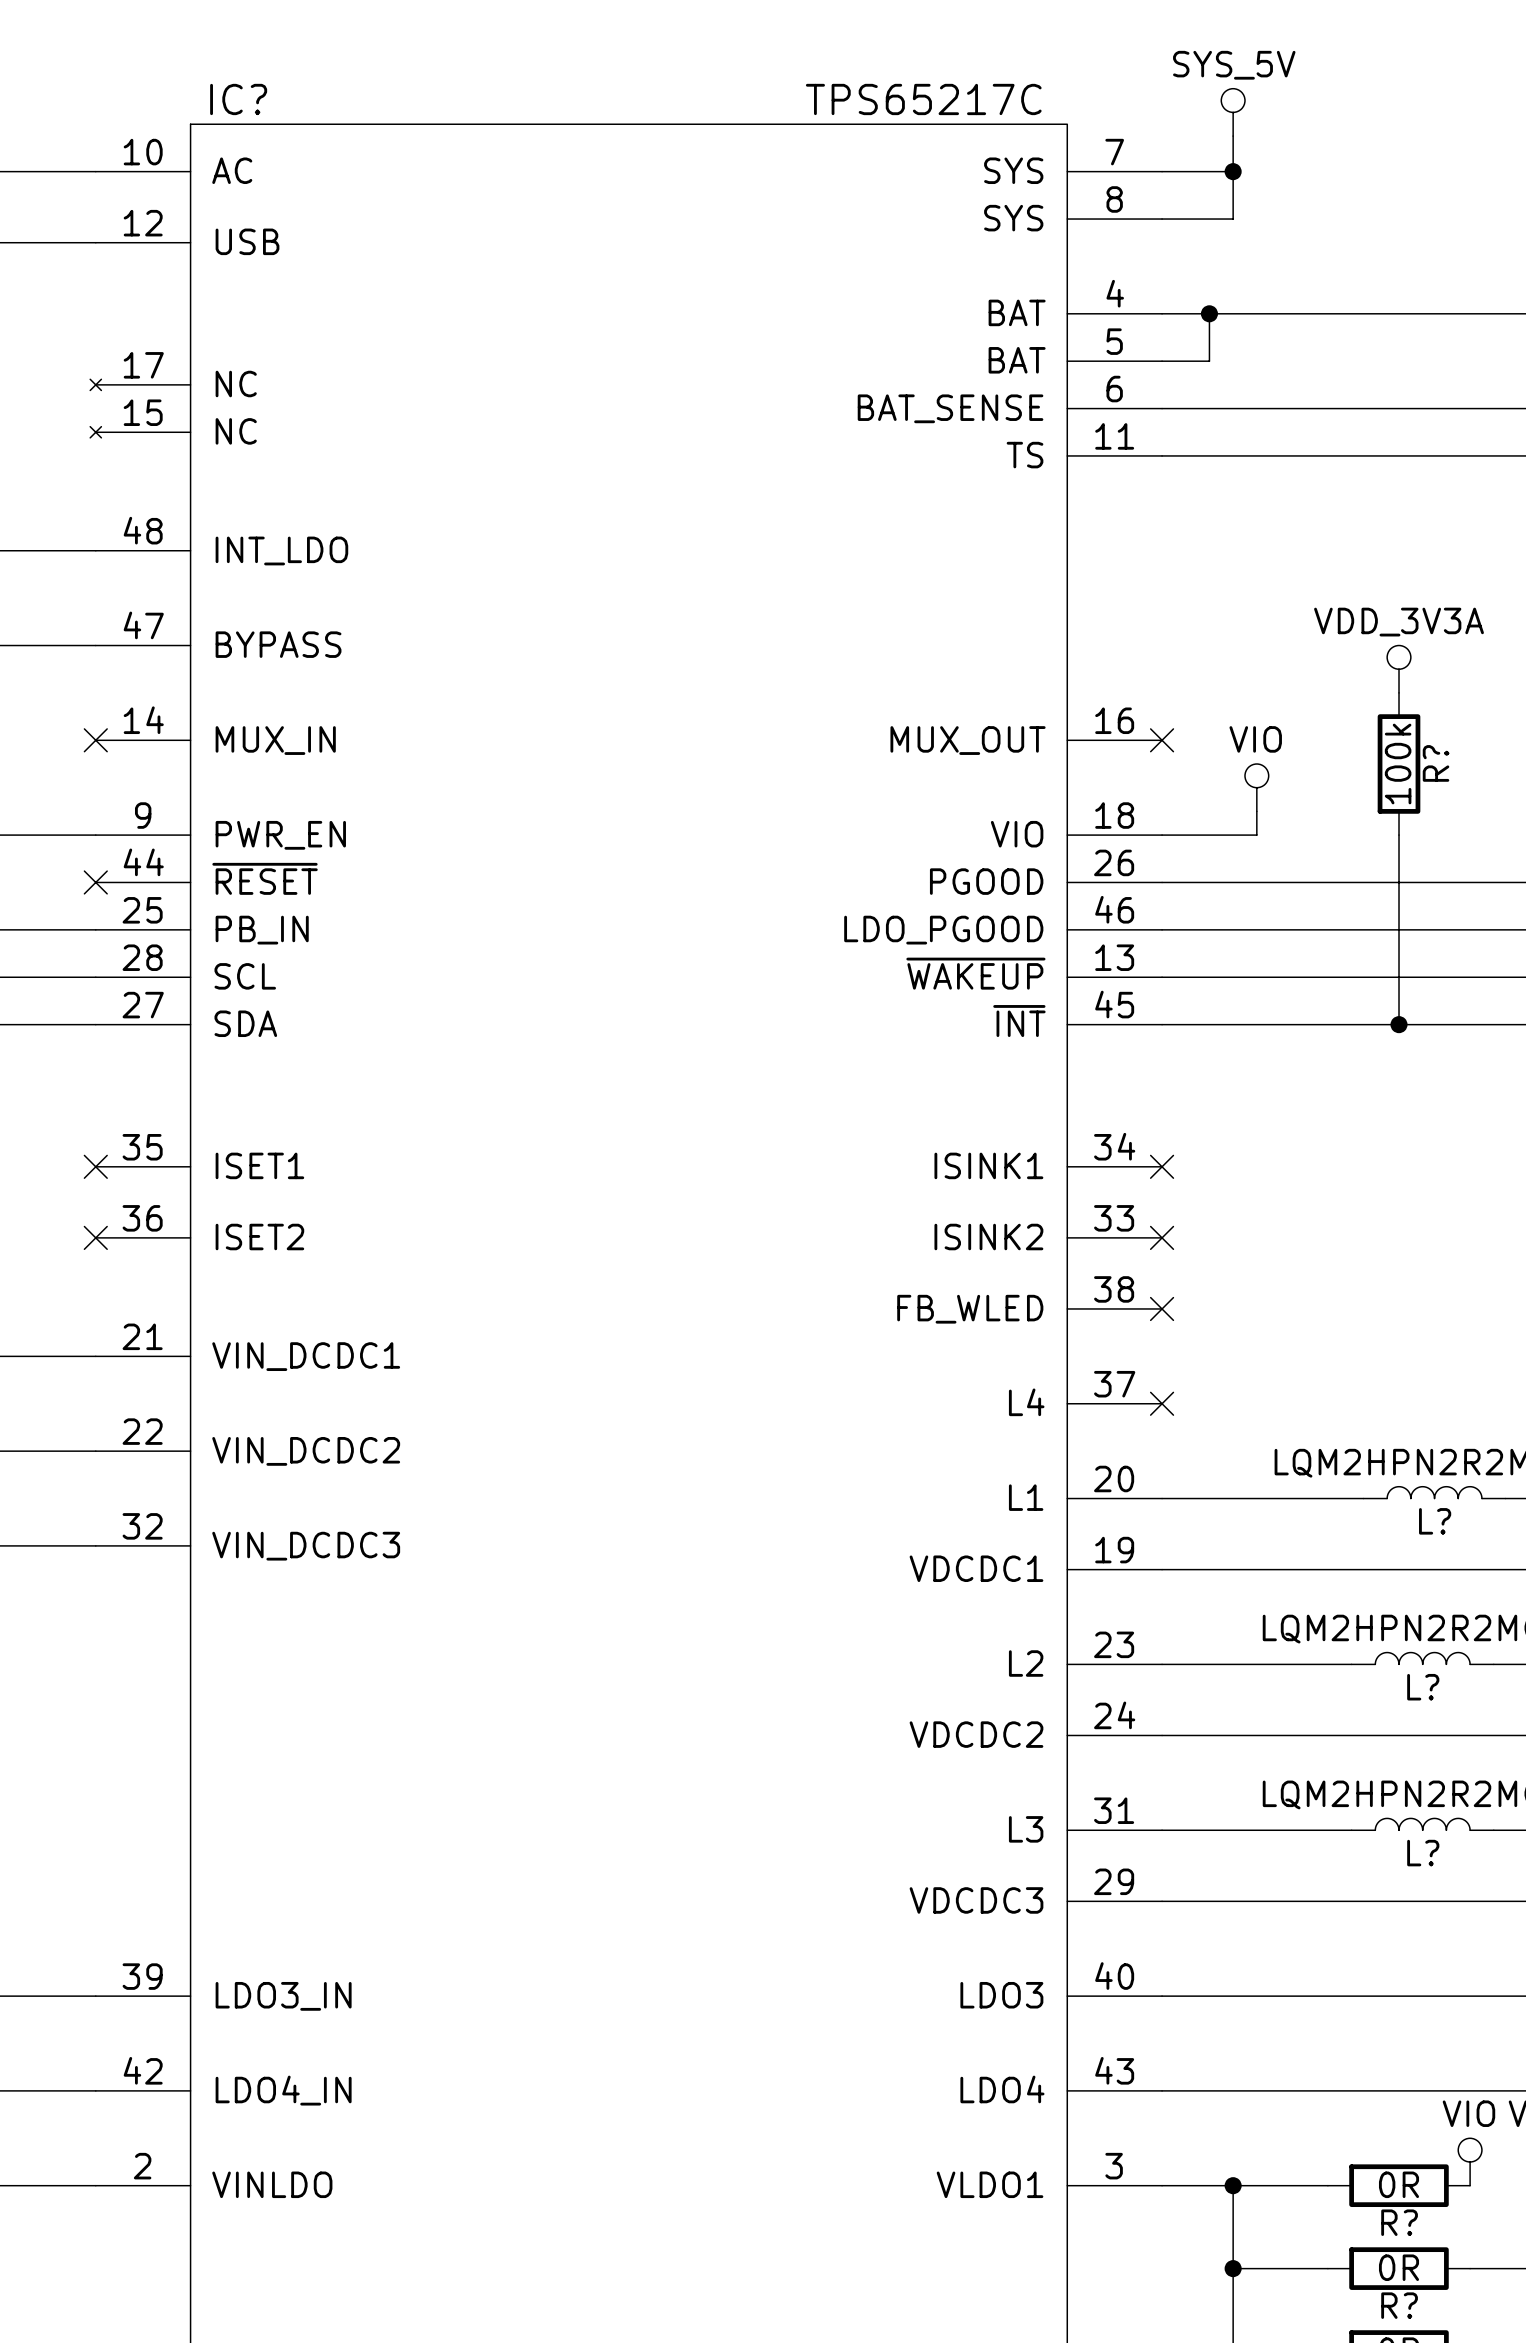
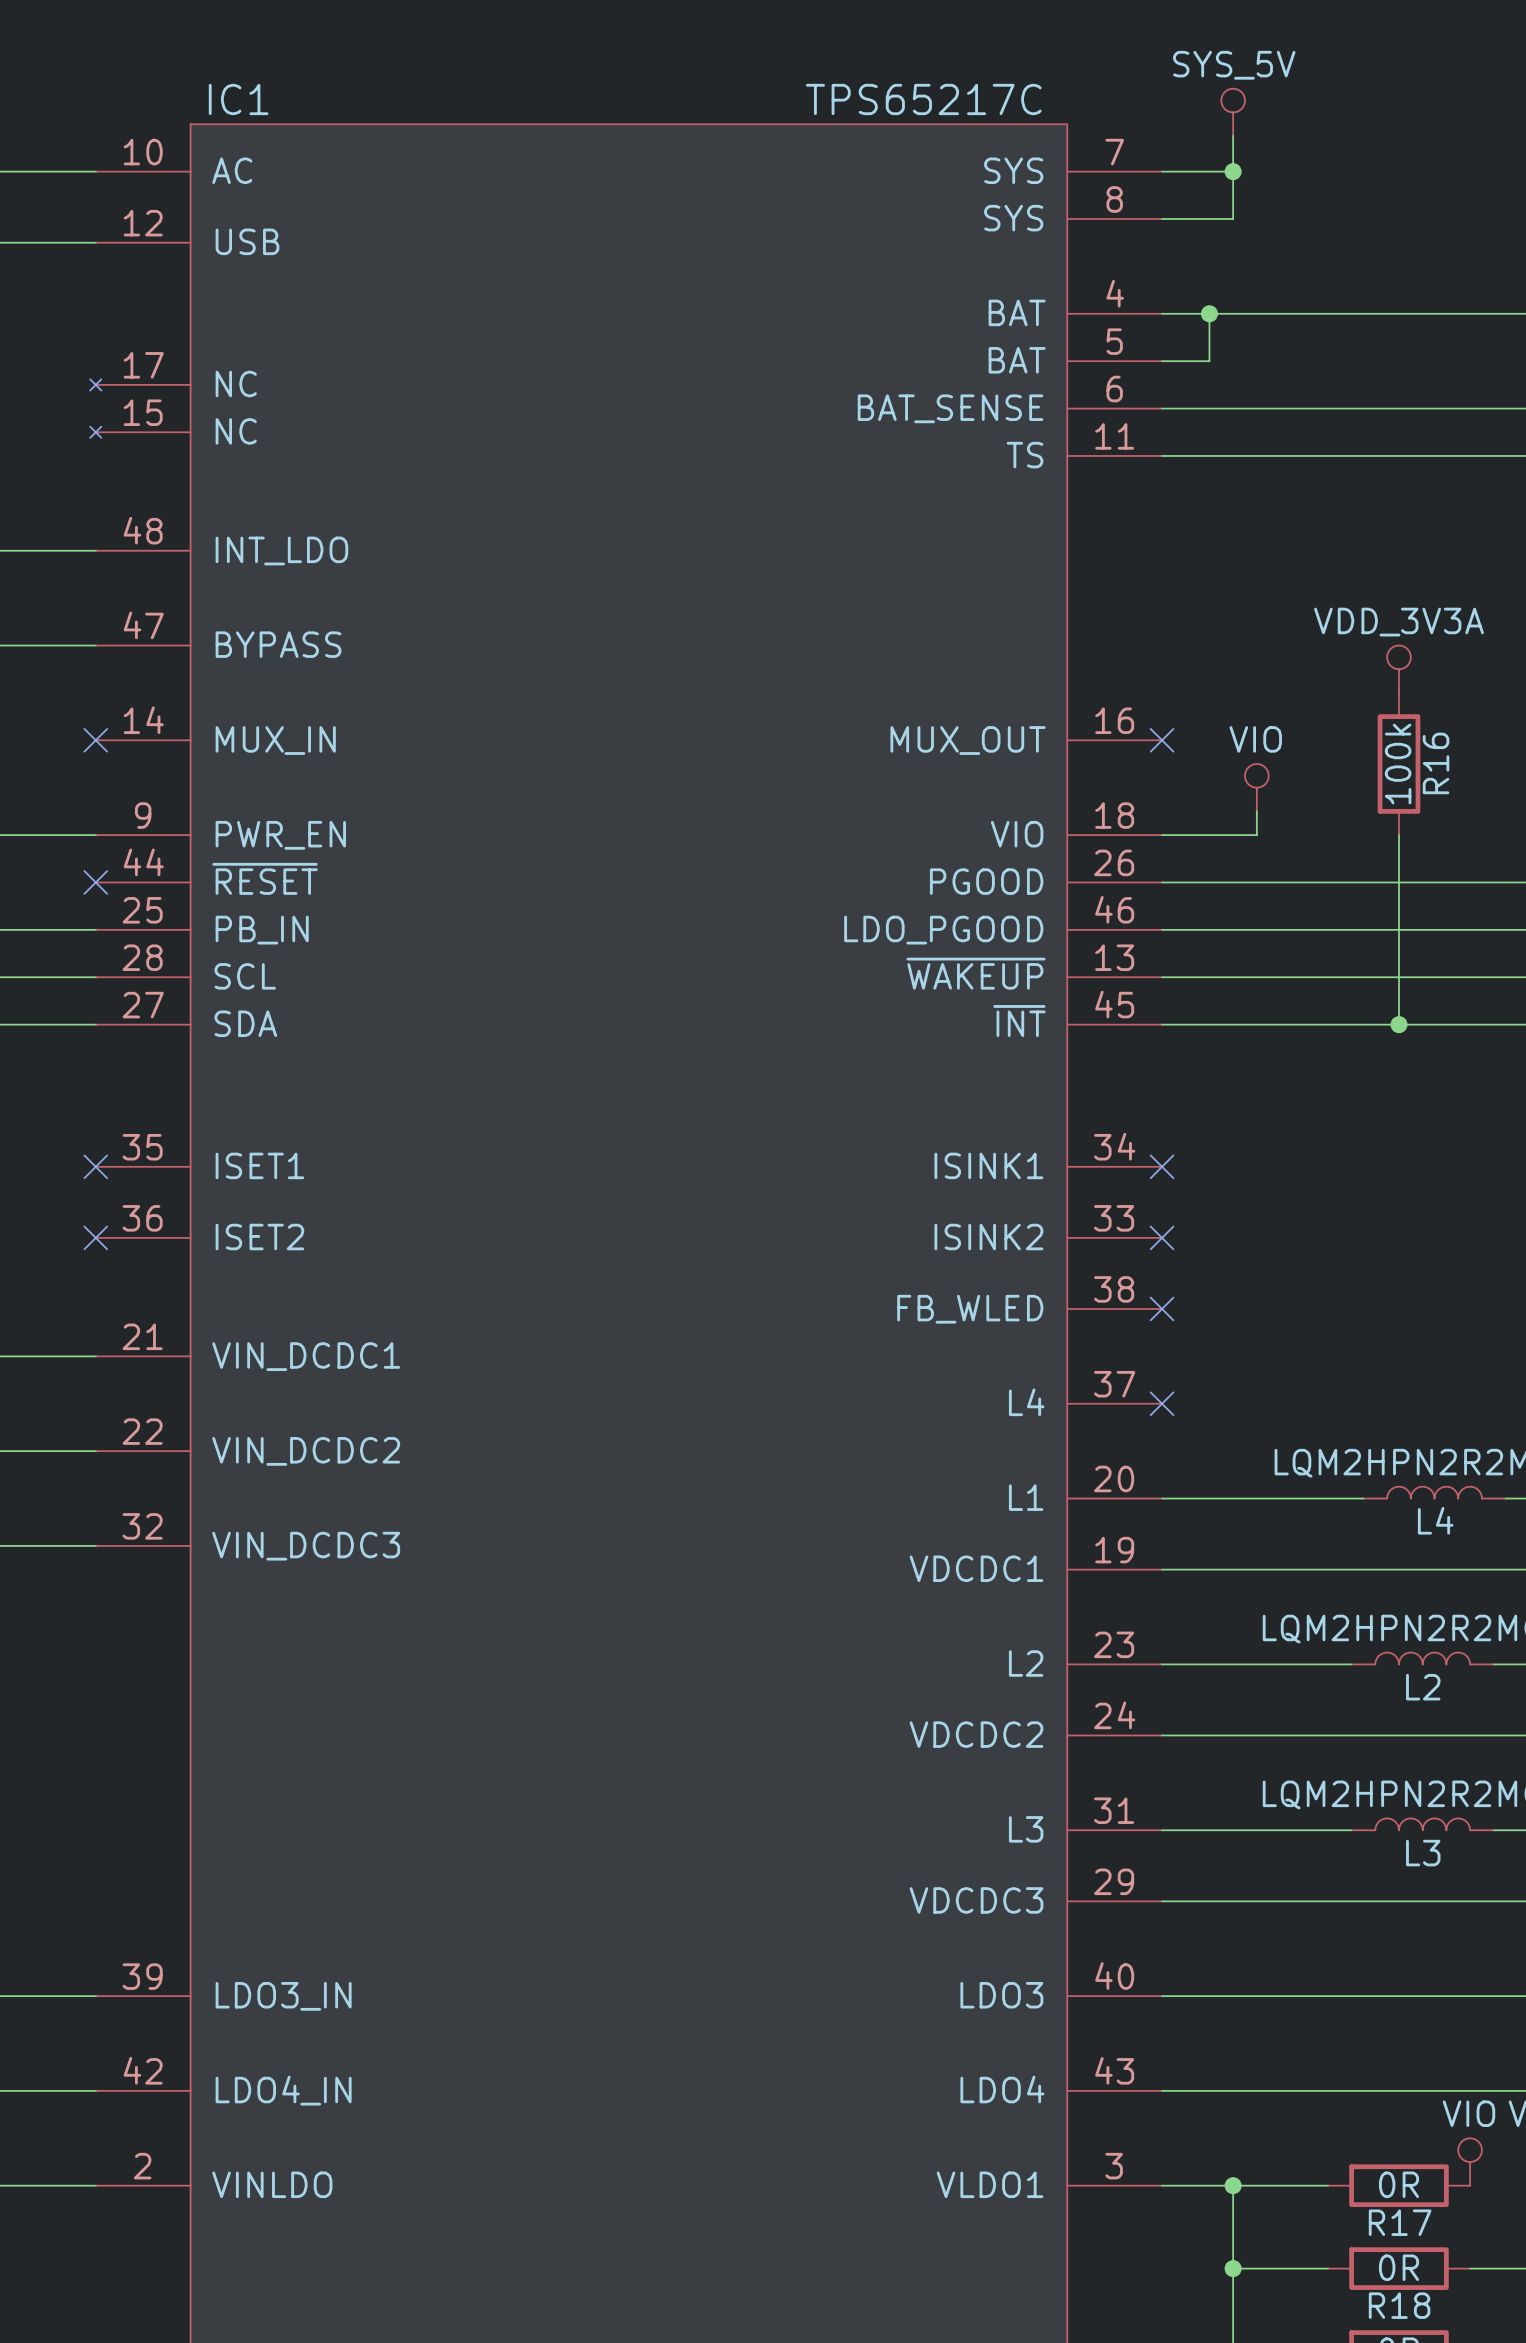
IC? name: IC? (238, 99) -> IC1 (238, 99)
R? name: R? (1436, 763) -> R16 (1436, 763)
L? name: L? (1435, 1521) -> L4 (1435, 1520)
L? name: L? (1423, 1687) -> L2 (1423, 1687)
L? name: L? (1423, 1853) -> L3 (1423, 1853)
R? name: R? (1399, 2222) -> R17 (1400, 2222)
R? name: R? (1399, 2305) -> R18 (1399, 2305)

